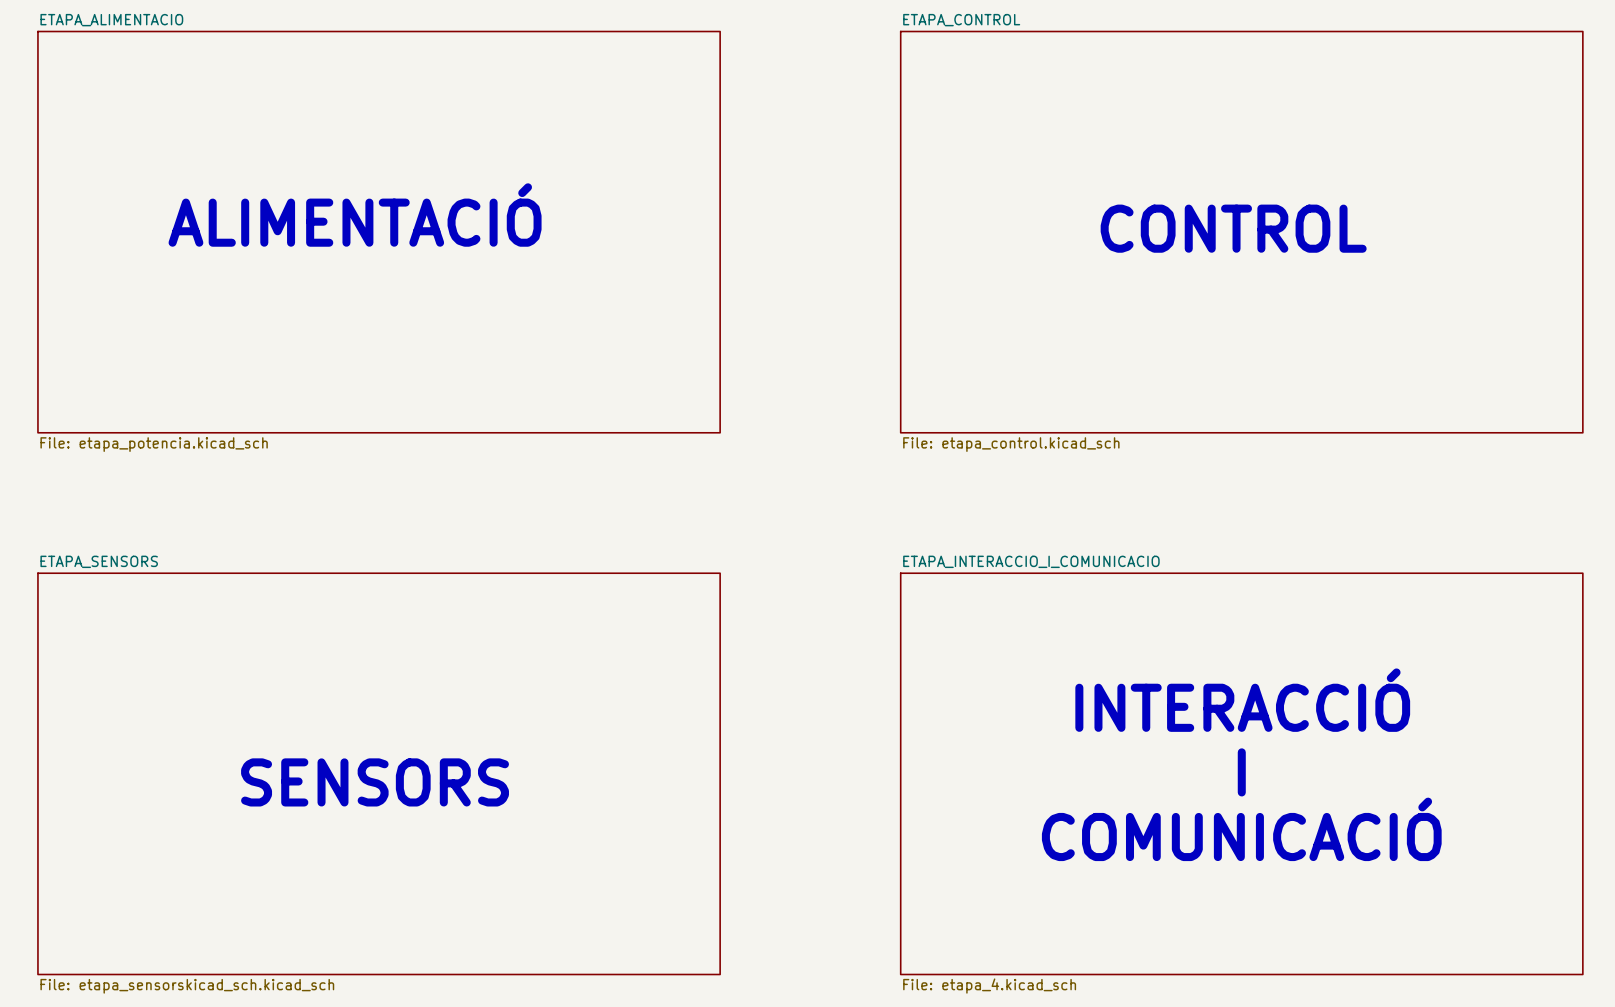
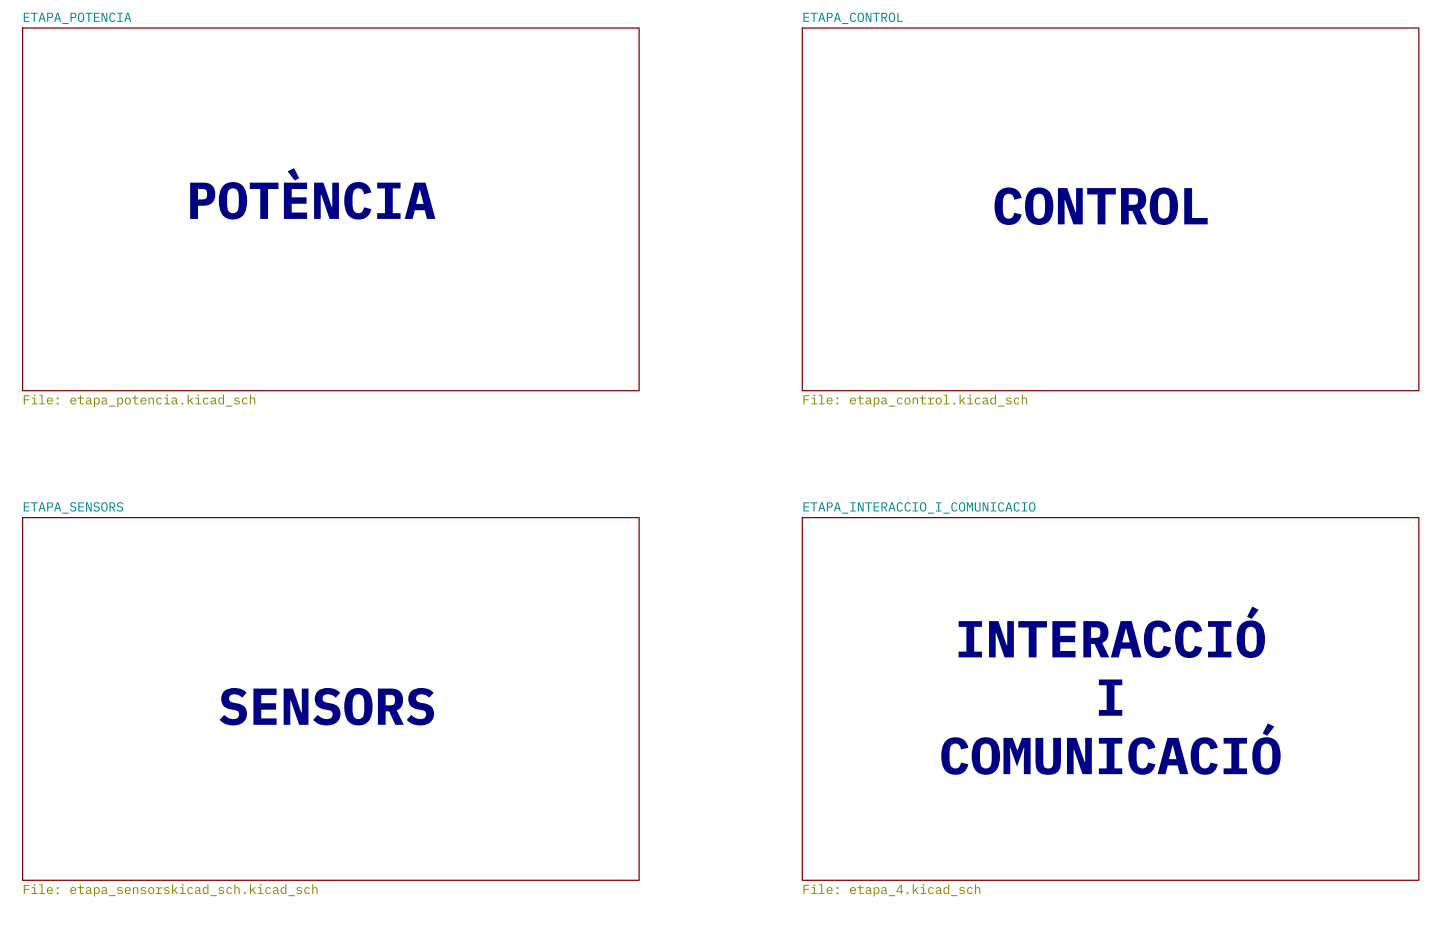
sheet ETAPA_ALIMENTACIO name: ETAPA_ALIMENTACIO (111, 20) -> ETAPA_POTENCIA (77, 18)
text: ALIMENTACIÓ (355, 215) -> POTÈNCIA (312, 193)

